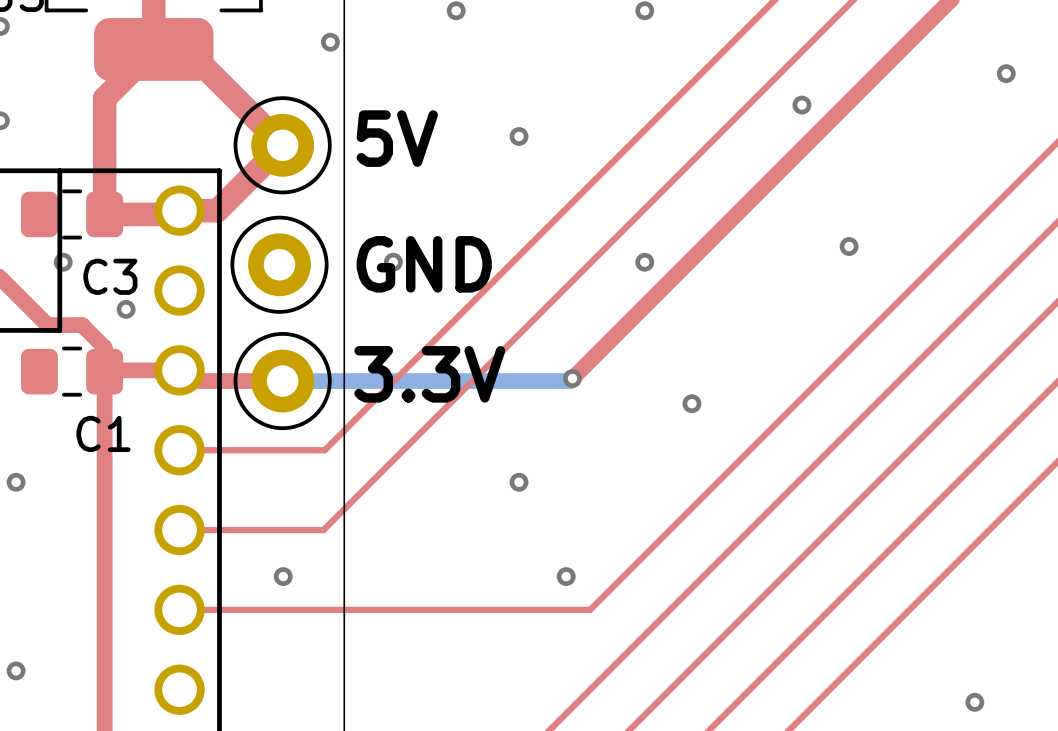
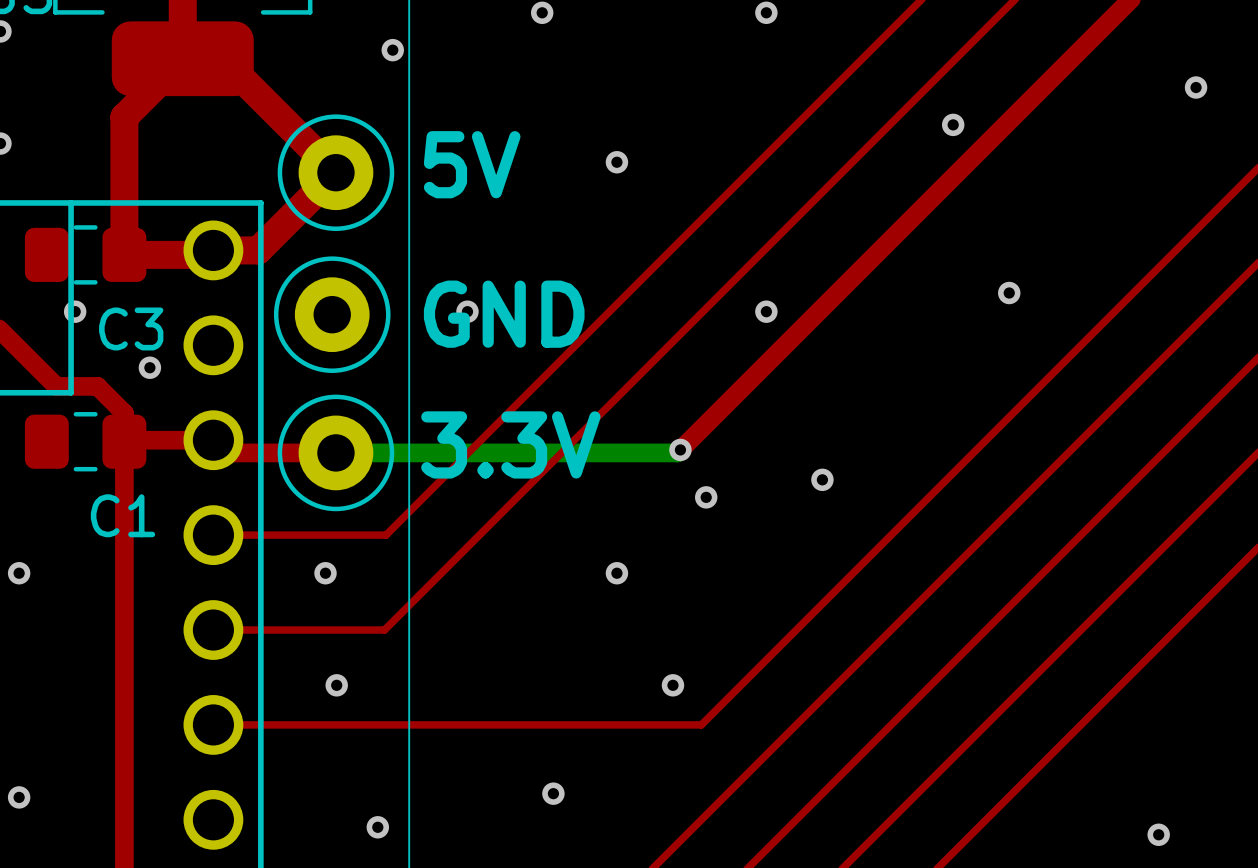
via: none -> (706, 497)
via: none -> (325, 573)
via: none -> (553, 793)
via: none -> (377, 827)

